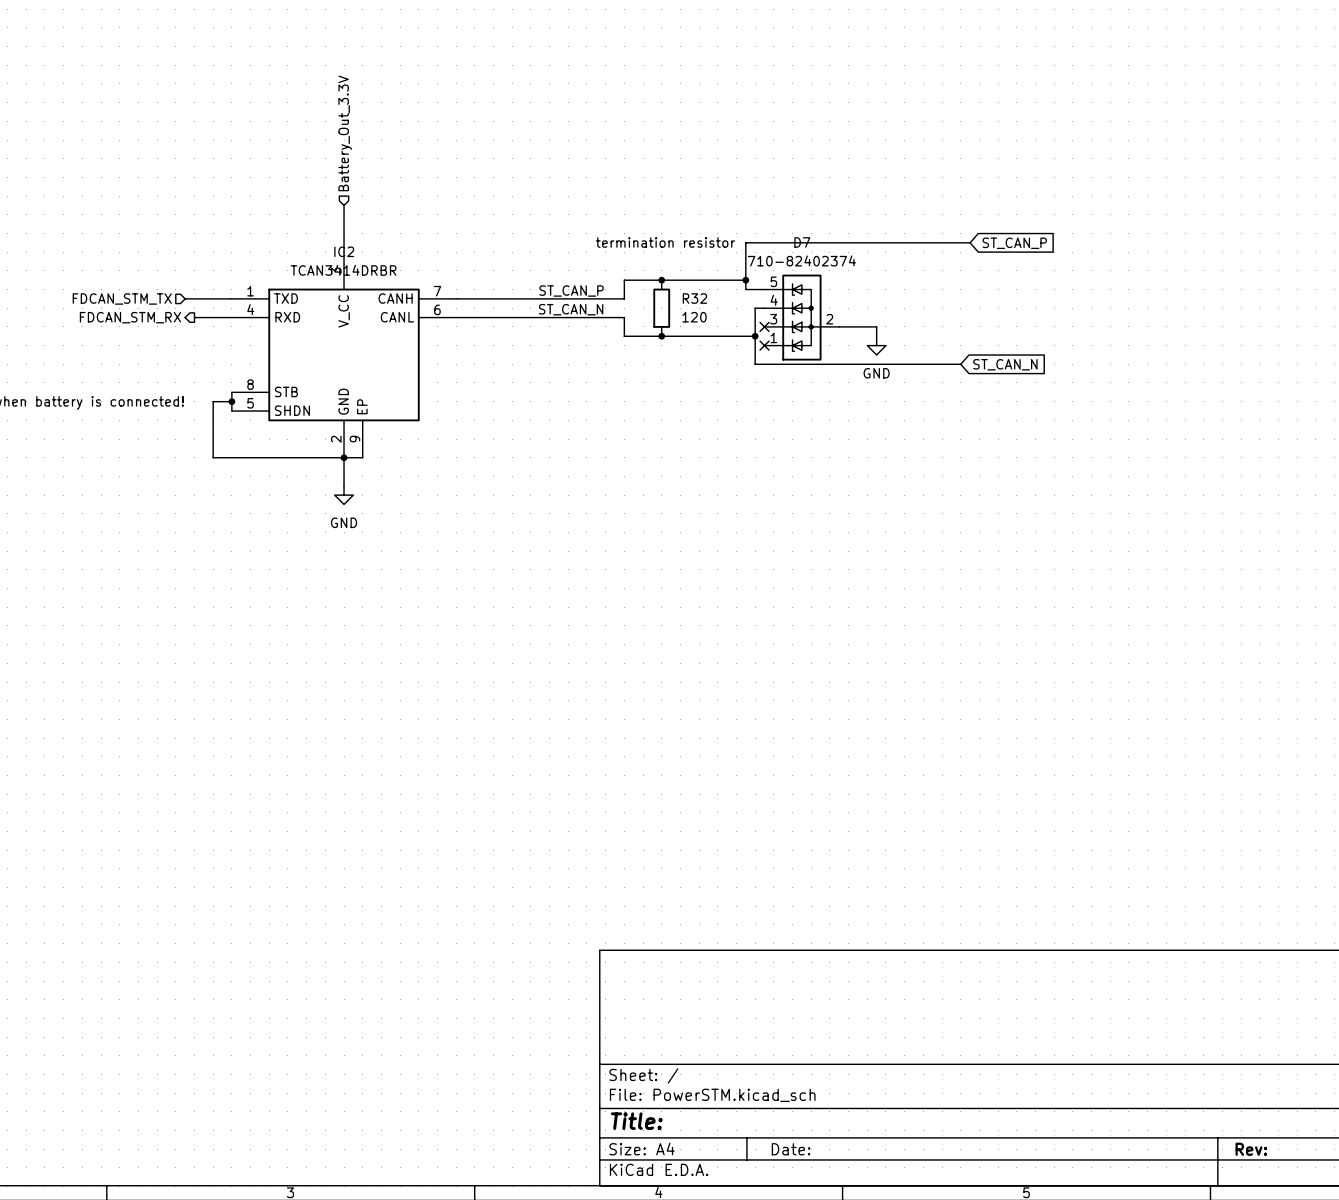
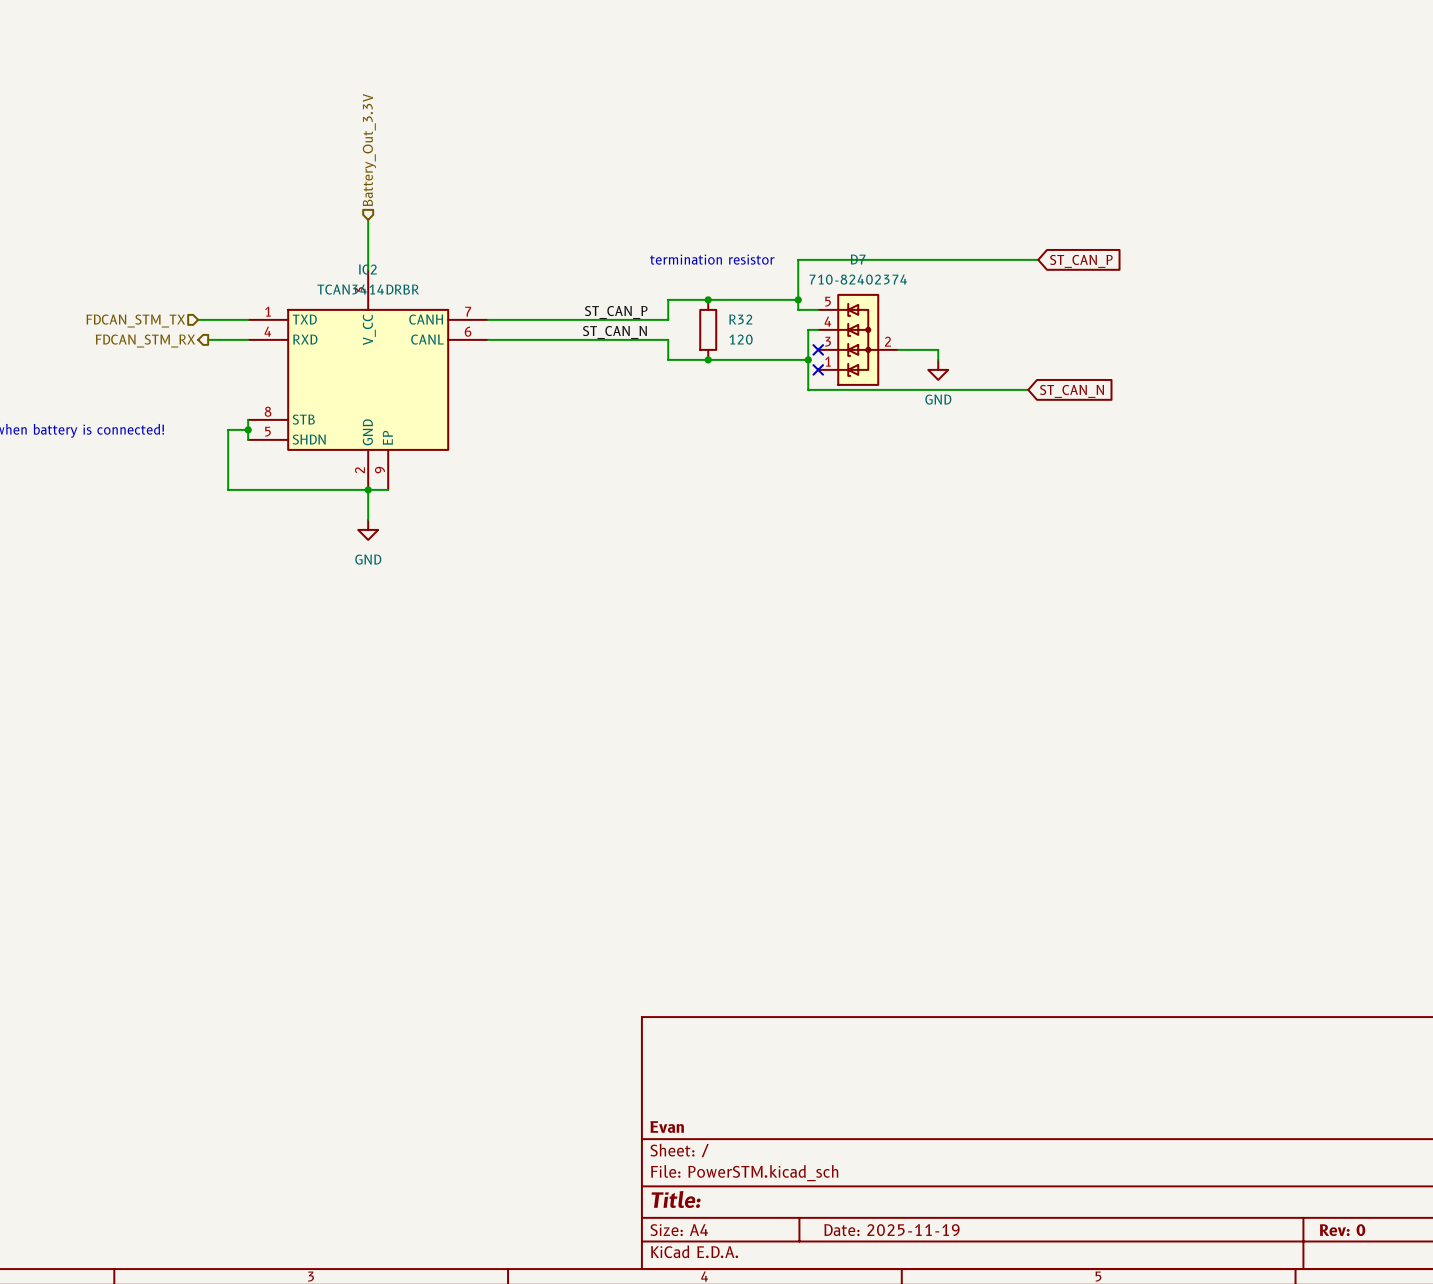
title block: none -> Evan (667, 1127)
title block: Date: (791, 1149) -> Date: 2025-11-19 (891, 1230)
title block: Rev: (1251, 1149) -> Rev: 0 (1342, 1230)

